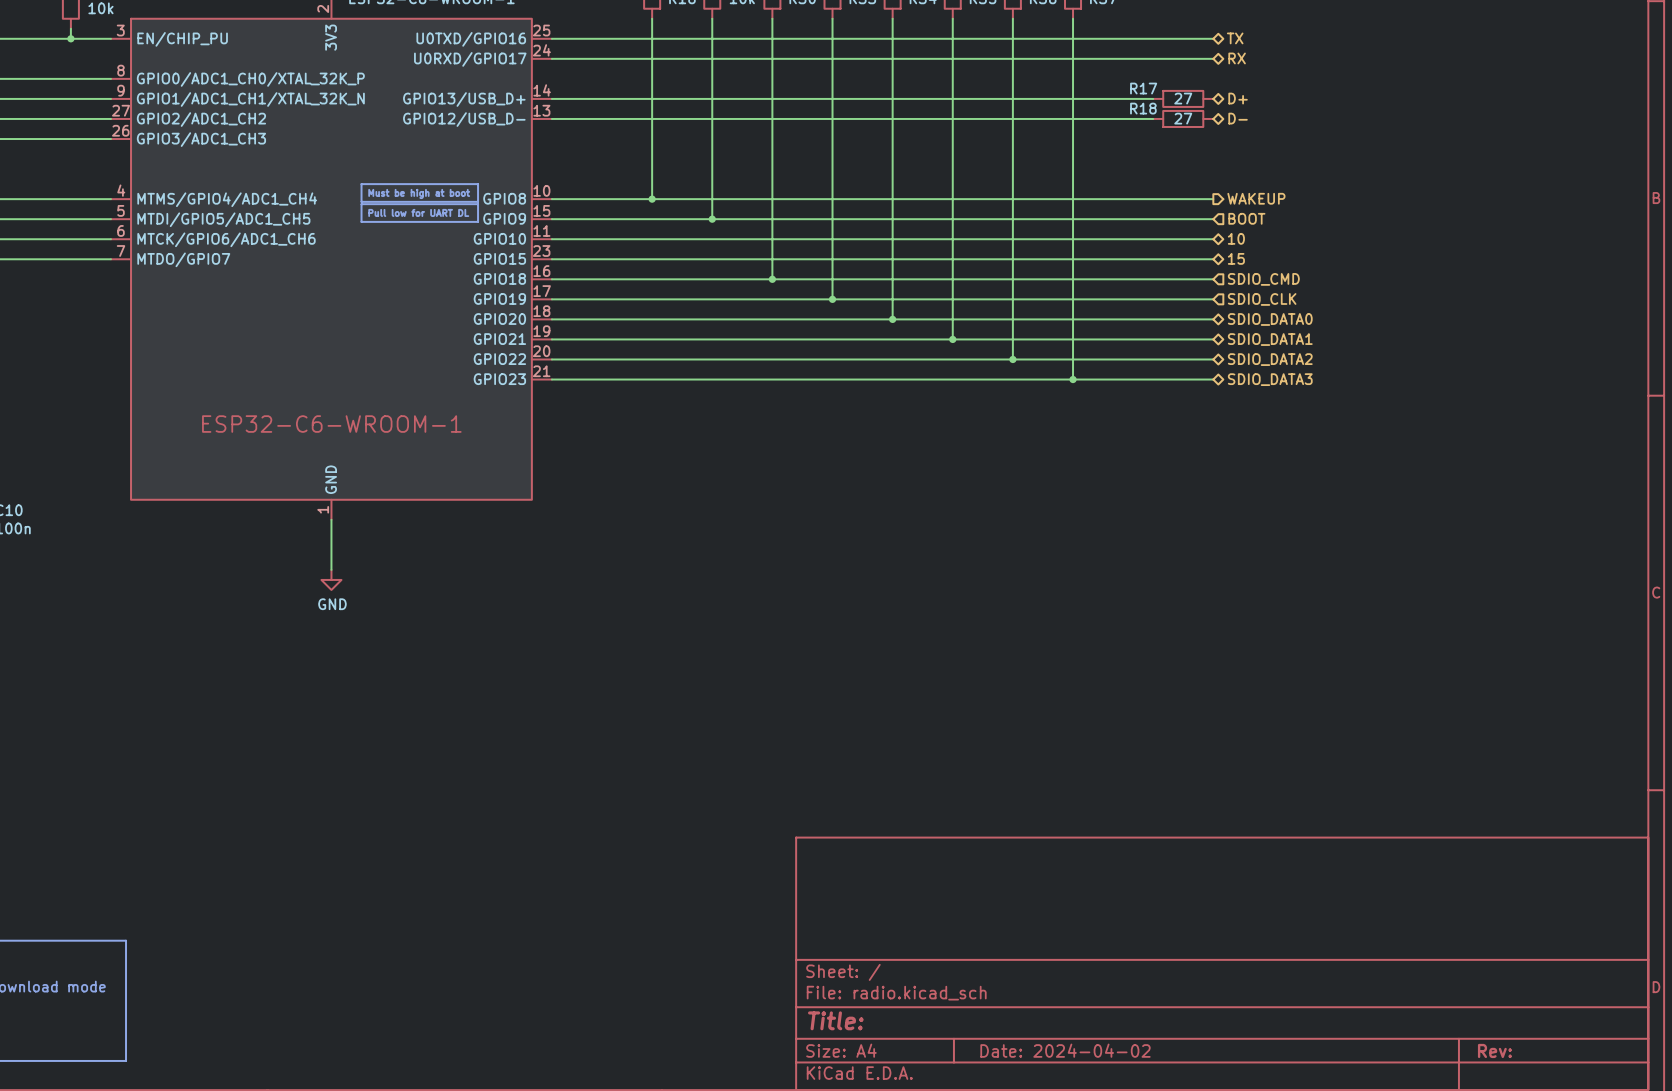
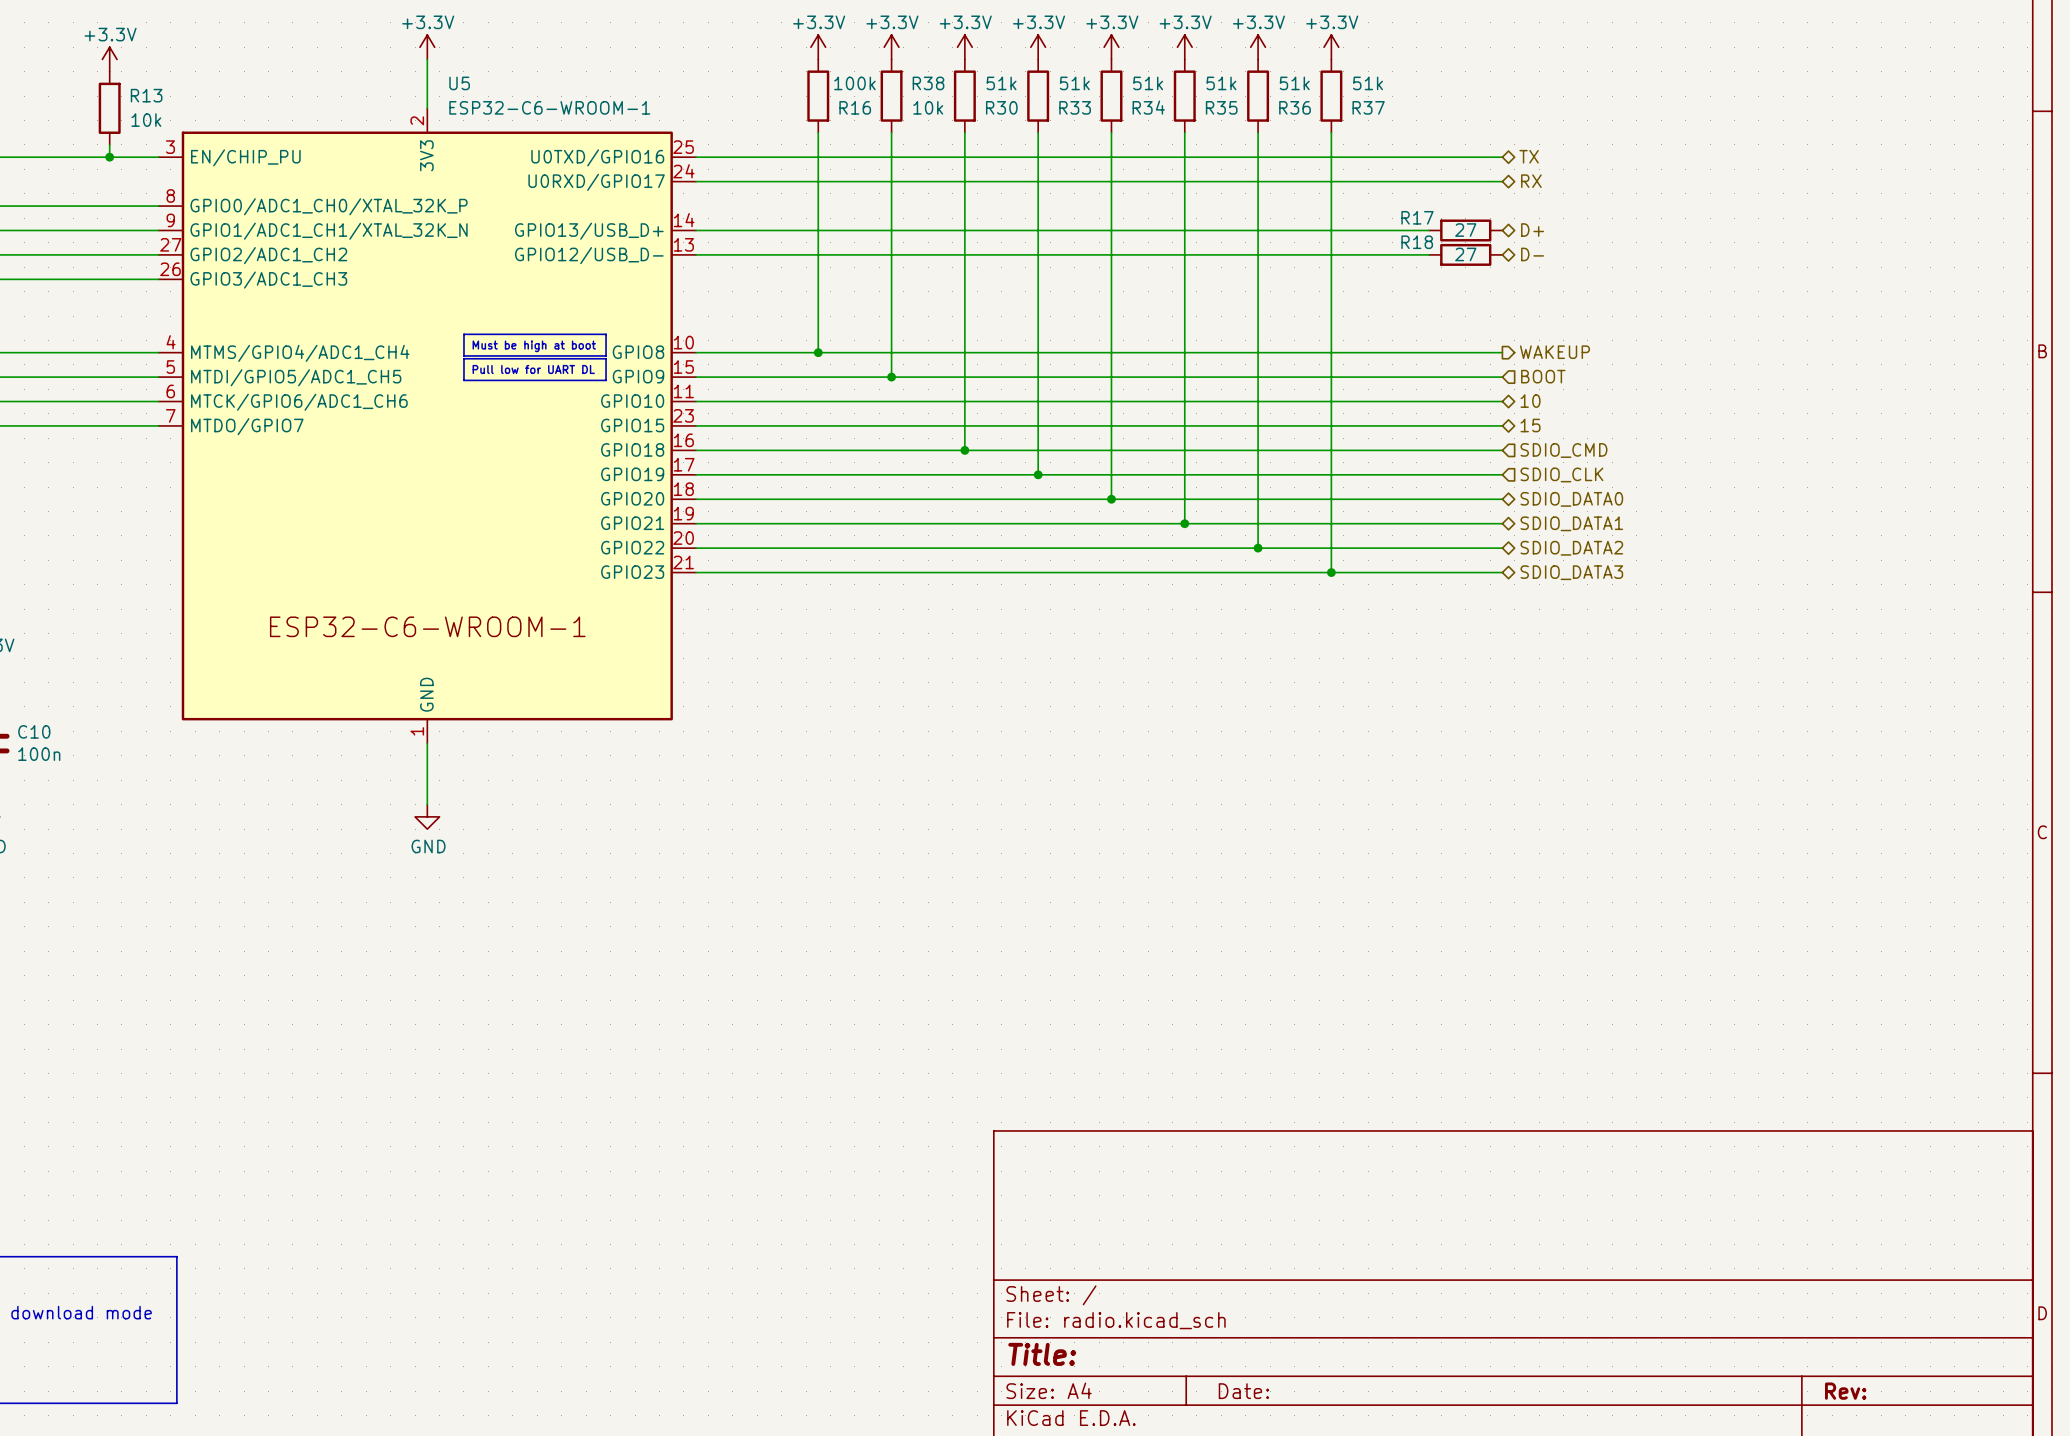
title block: Date: 2024-04-02 (1065, 1050) -> Date: (1243, 1391)

